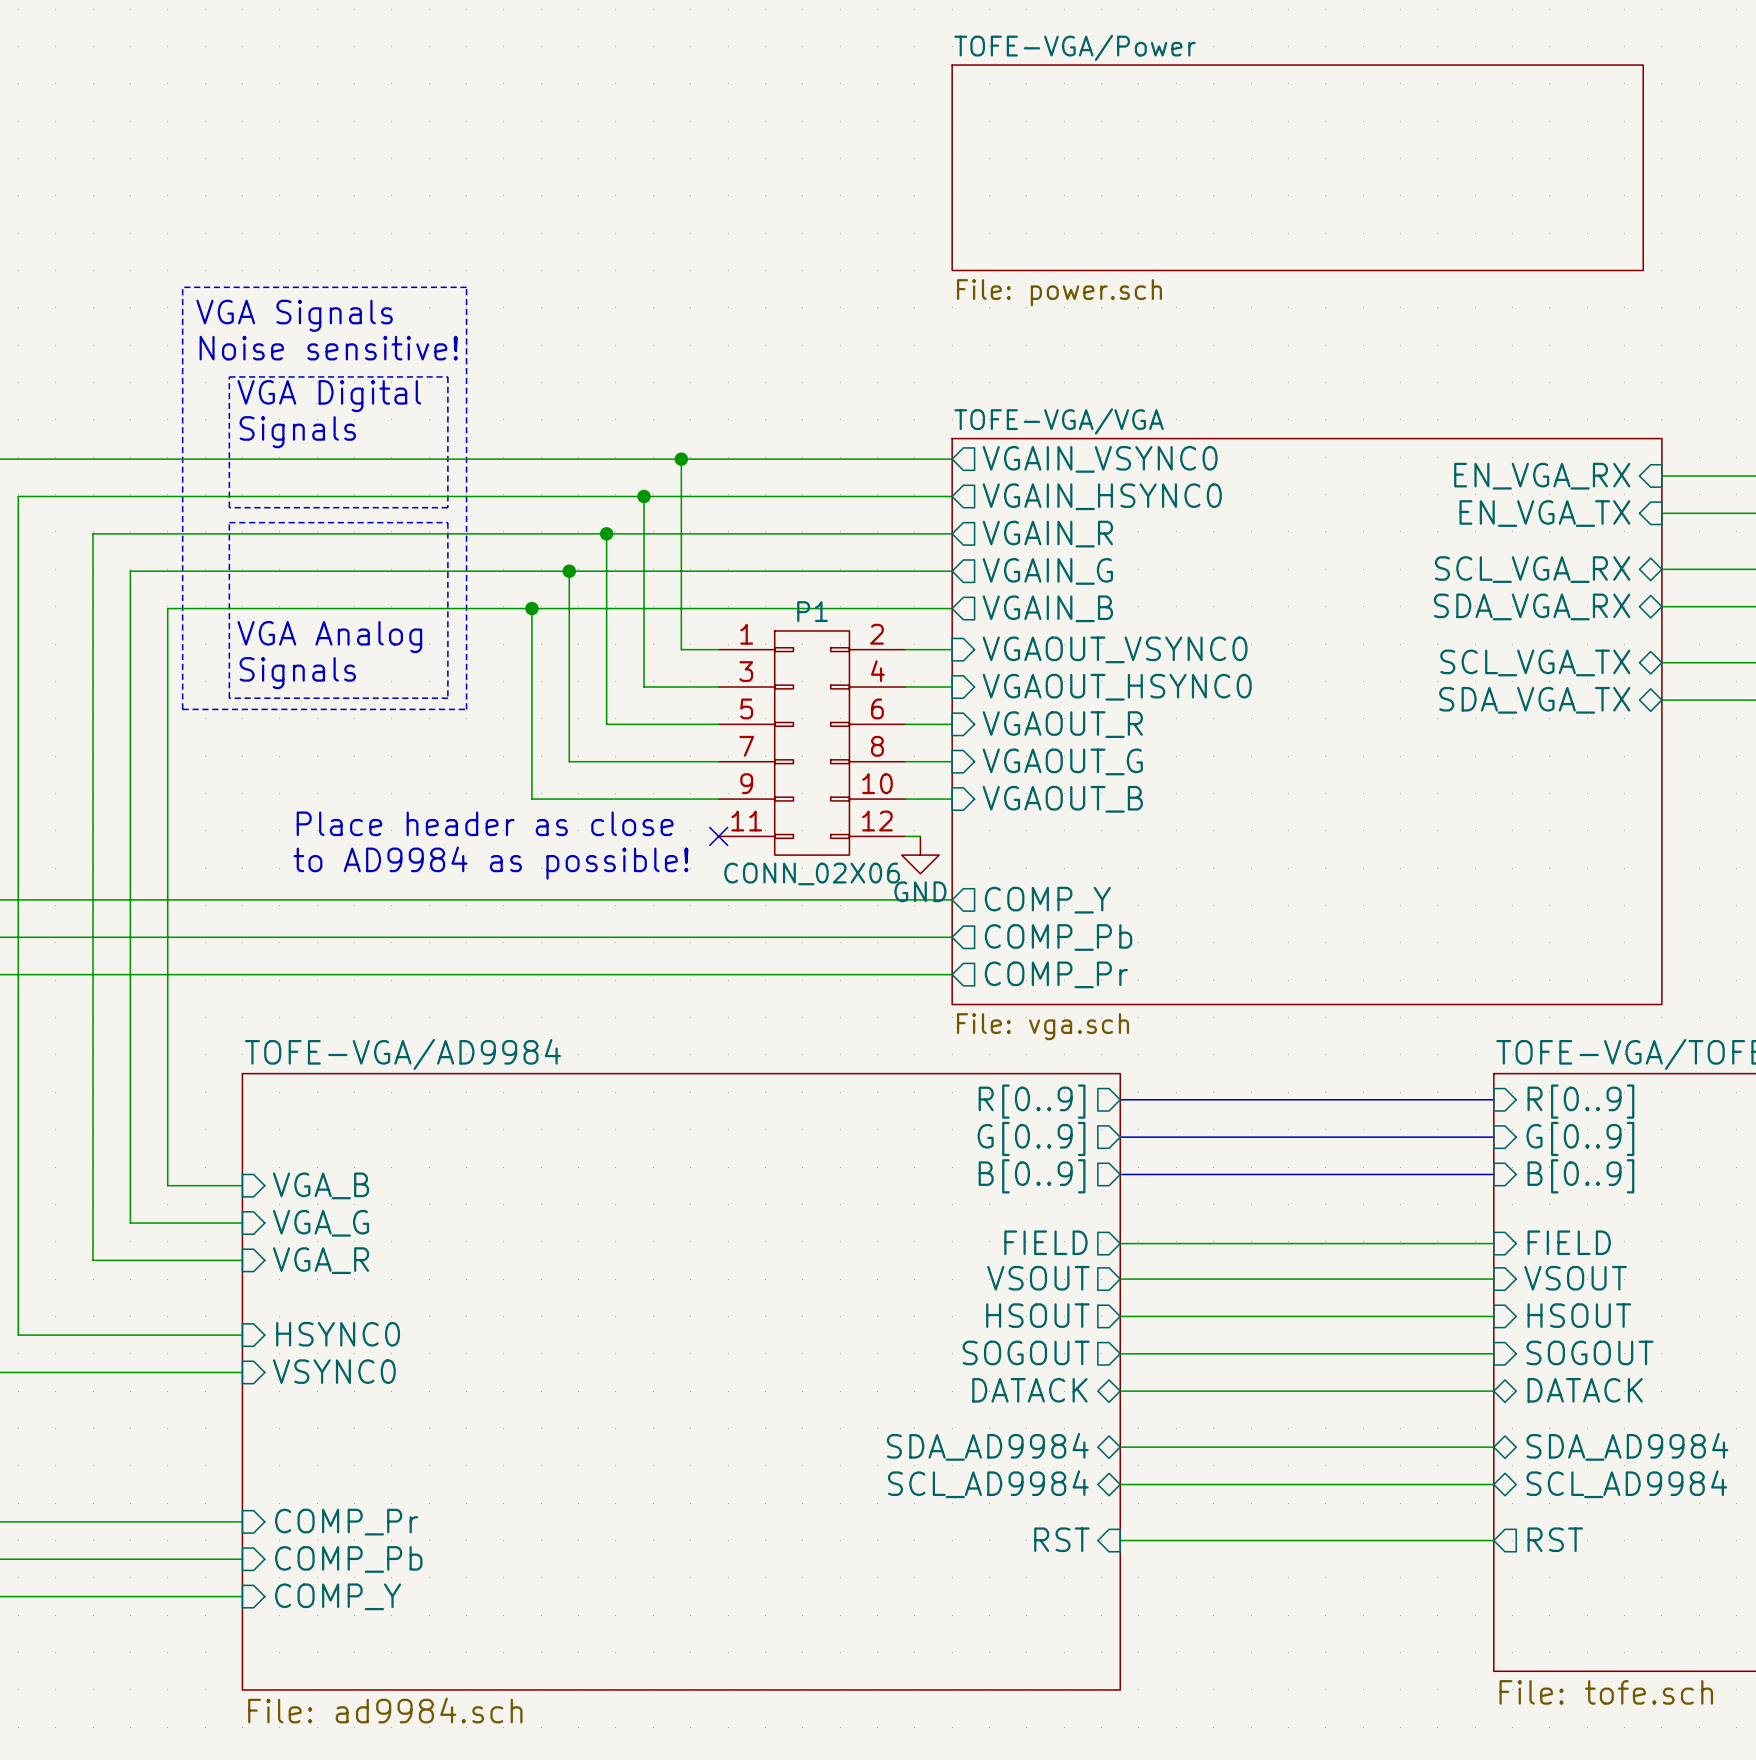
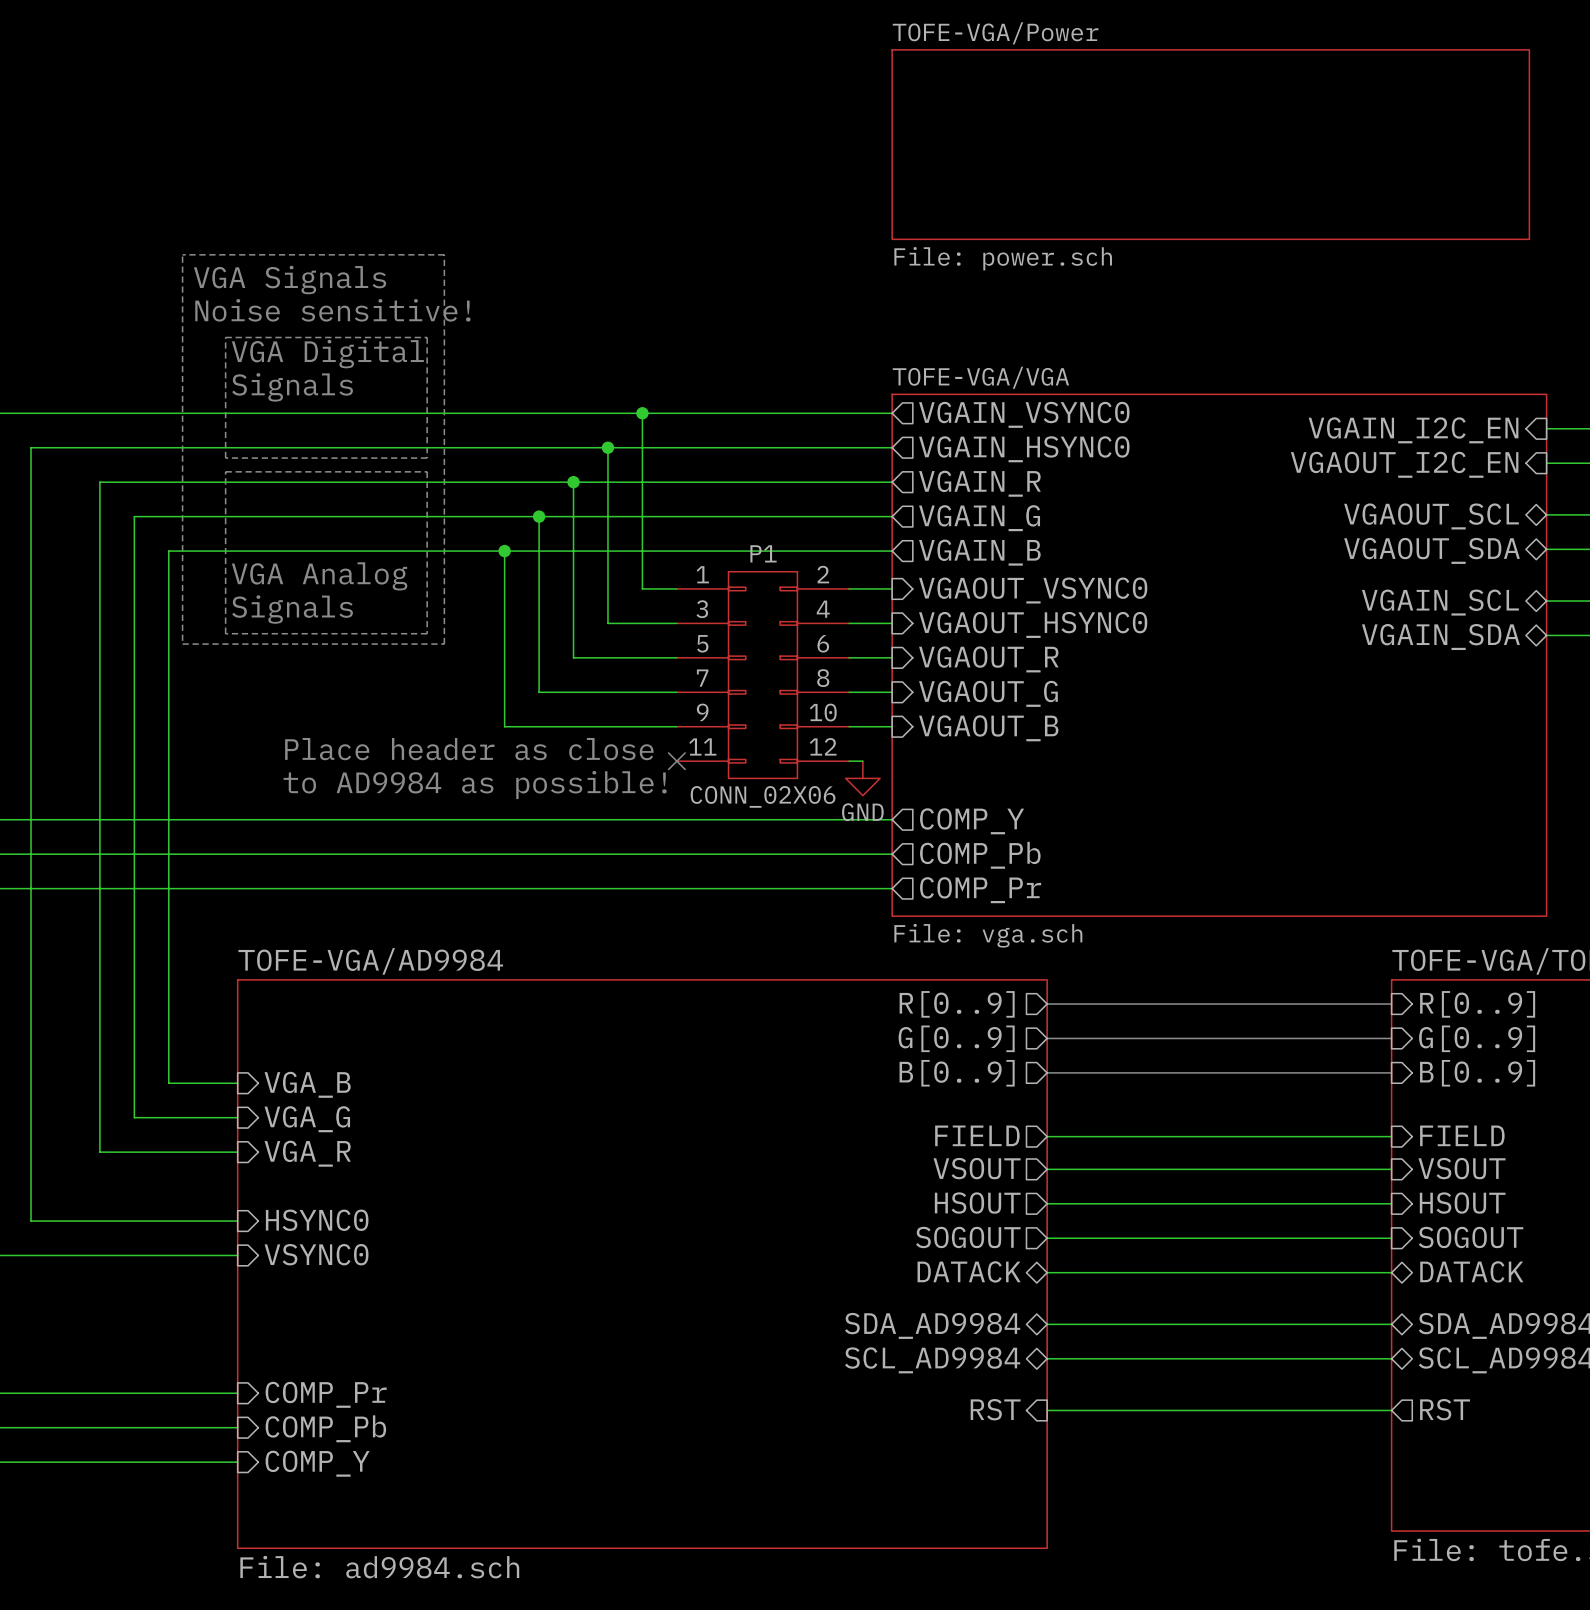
sheet pin: EN_VGA_RX (1542, 476) -> VGAIN_I2C_EN (1413, 430)
sheet pin: EN_VGA_TX (1544, 513) -> VGAOUT_I2C_EN (1404, 464)
sheet pin: SCL_VGA_RX (1532, 569) -> VGAOUT_SCL (1431, 516)
sheet pin: SDA_VGA_RX (1532, 606) -> VGAOUT_SDA (1432, 550)
sheet pin: SCL_VGA_TX (1535, 662) -> VGAIN_SCL (1440, 602)
sheet pin: SDA_VGA_TX (1534, 700) -> VGAIN_SDA (1440, 637)

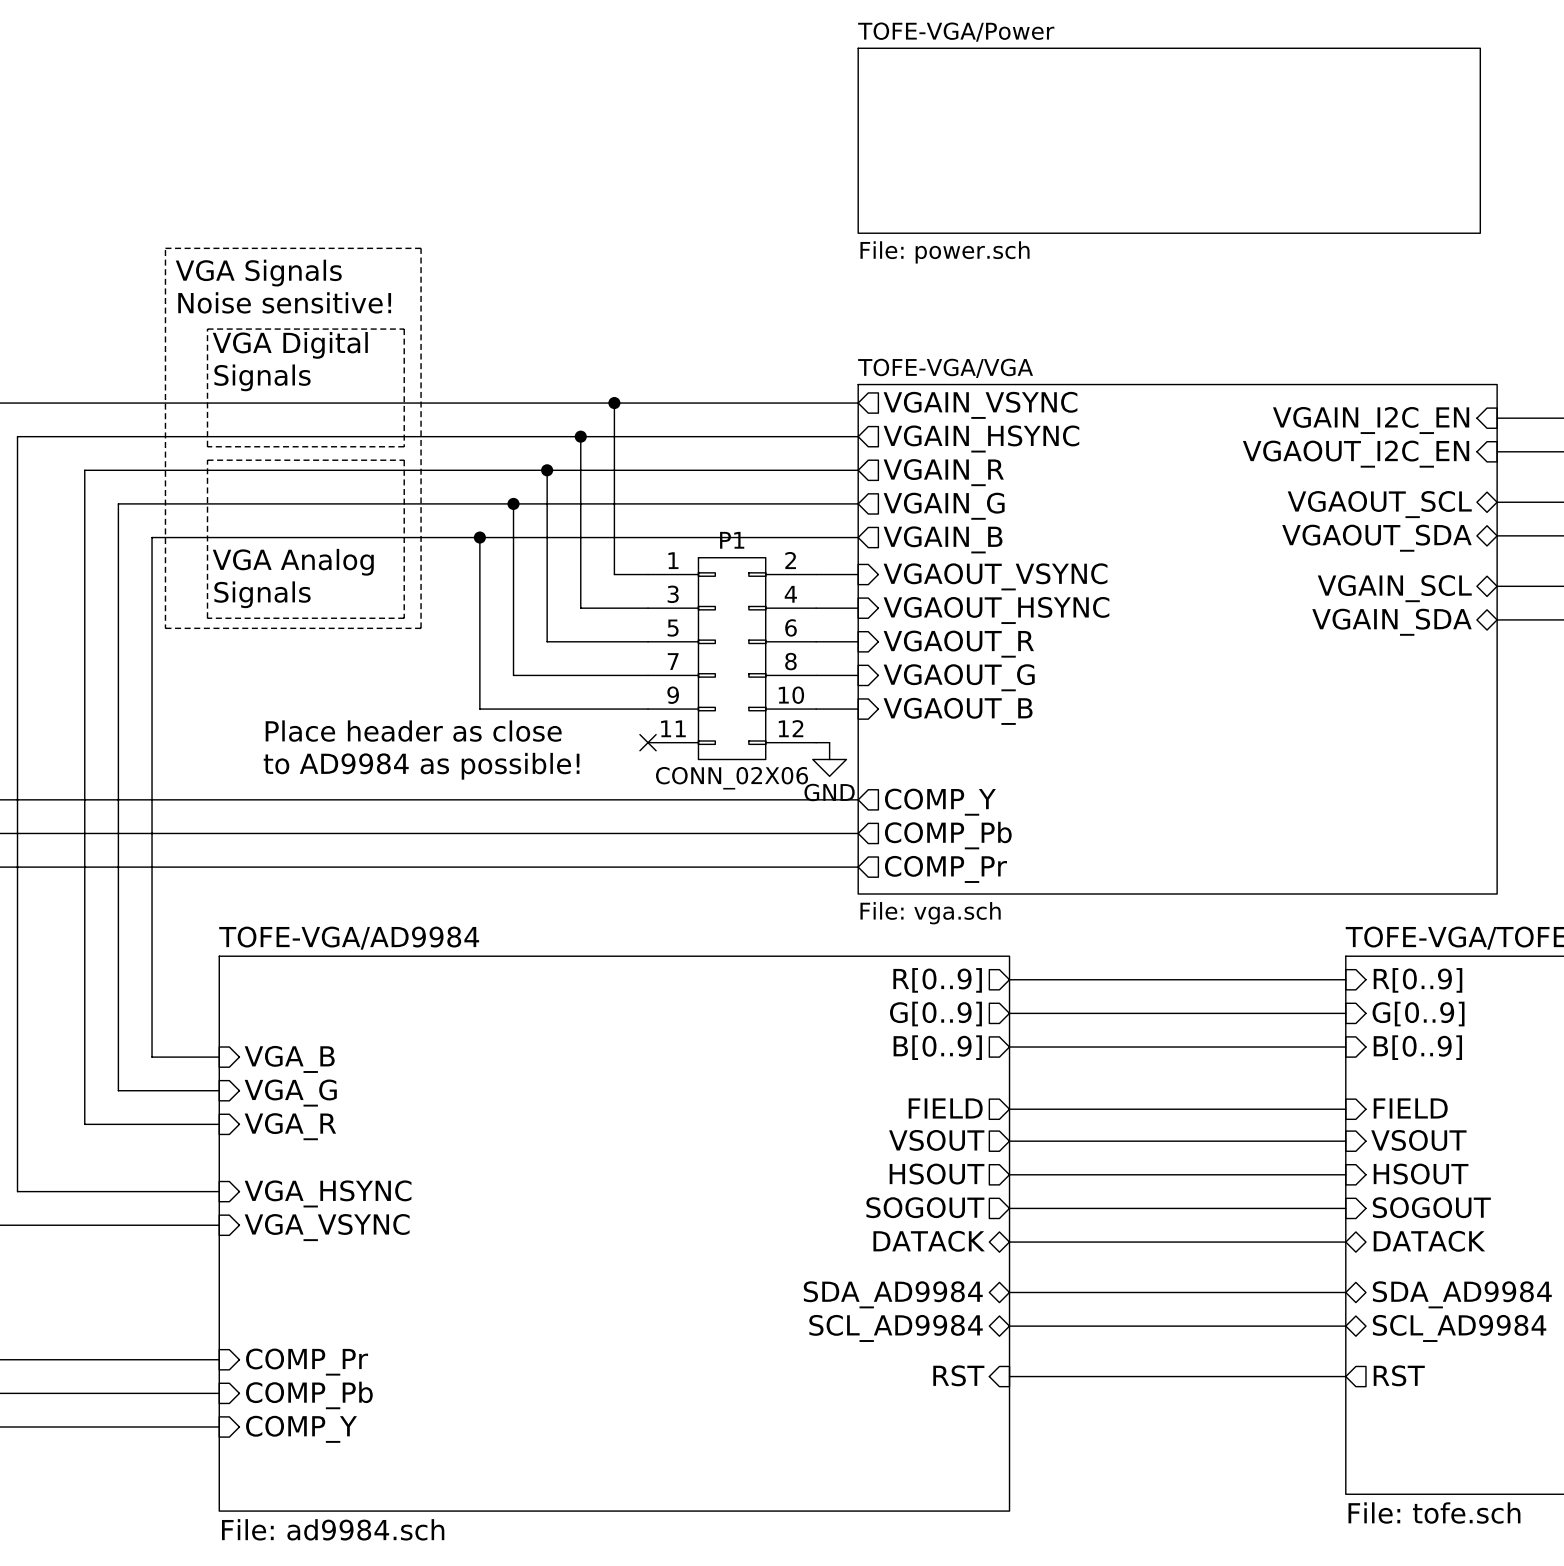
sheet pin: VGAIN_VSYNC0 (1024, 414) -> VGAIN_VSYNC (980, 405)
sheet pin: VGAIN_HSYNC0 (1024, 449) -> VGAIN_HSYNC (981, 438)
sheet pin: VGAOUT_VSYNC0 (1033, 590) -> VGAOUT_VSYNC (995, 576)
sheet pin: VGAOUT_HSYNC0 (1033, 624) -> VGAOUT_HSYNC (996, 610)
sheet pin: HSYNC0 (317, 1220) -> VGA_HSYNC (328, 1193)
sheet pin: VSYNC0 (316, 1254) -> VGA_VSYNC (327, 1227)

